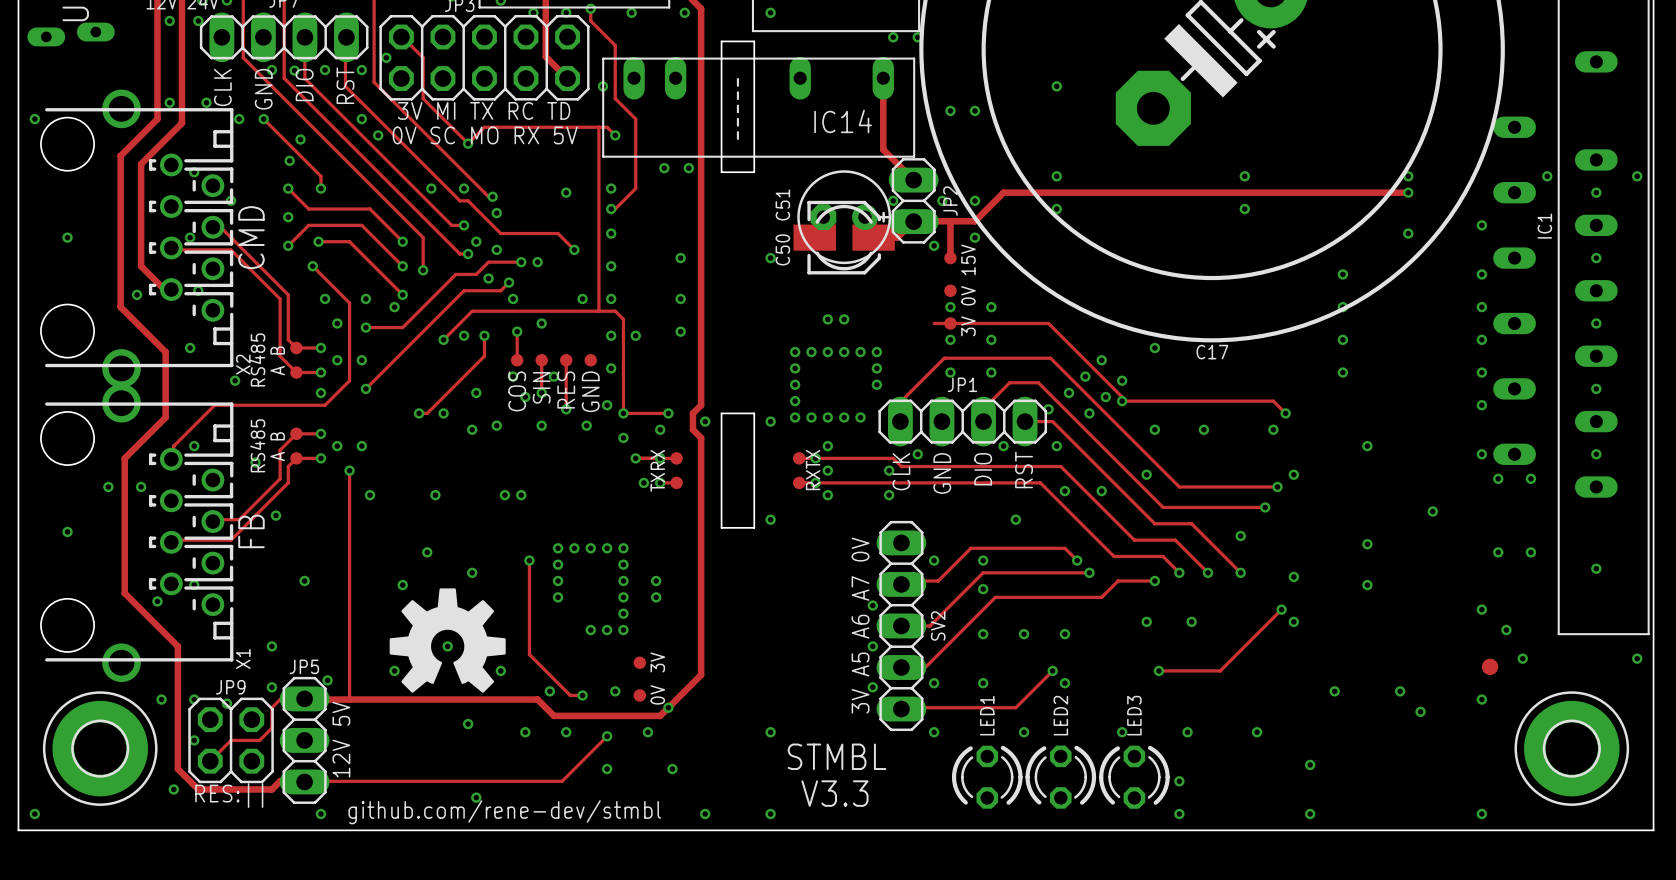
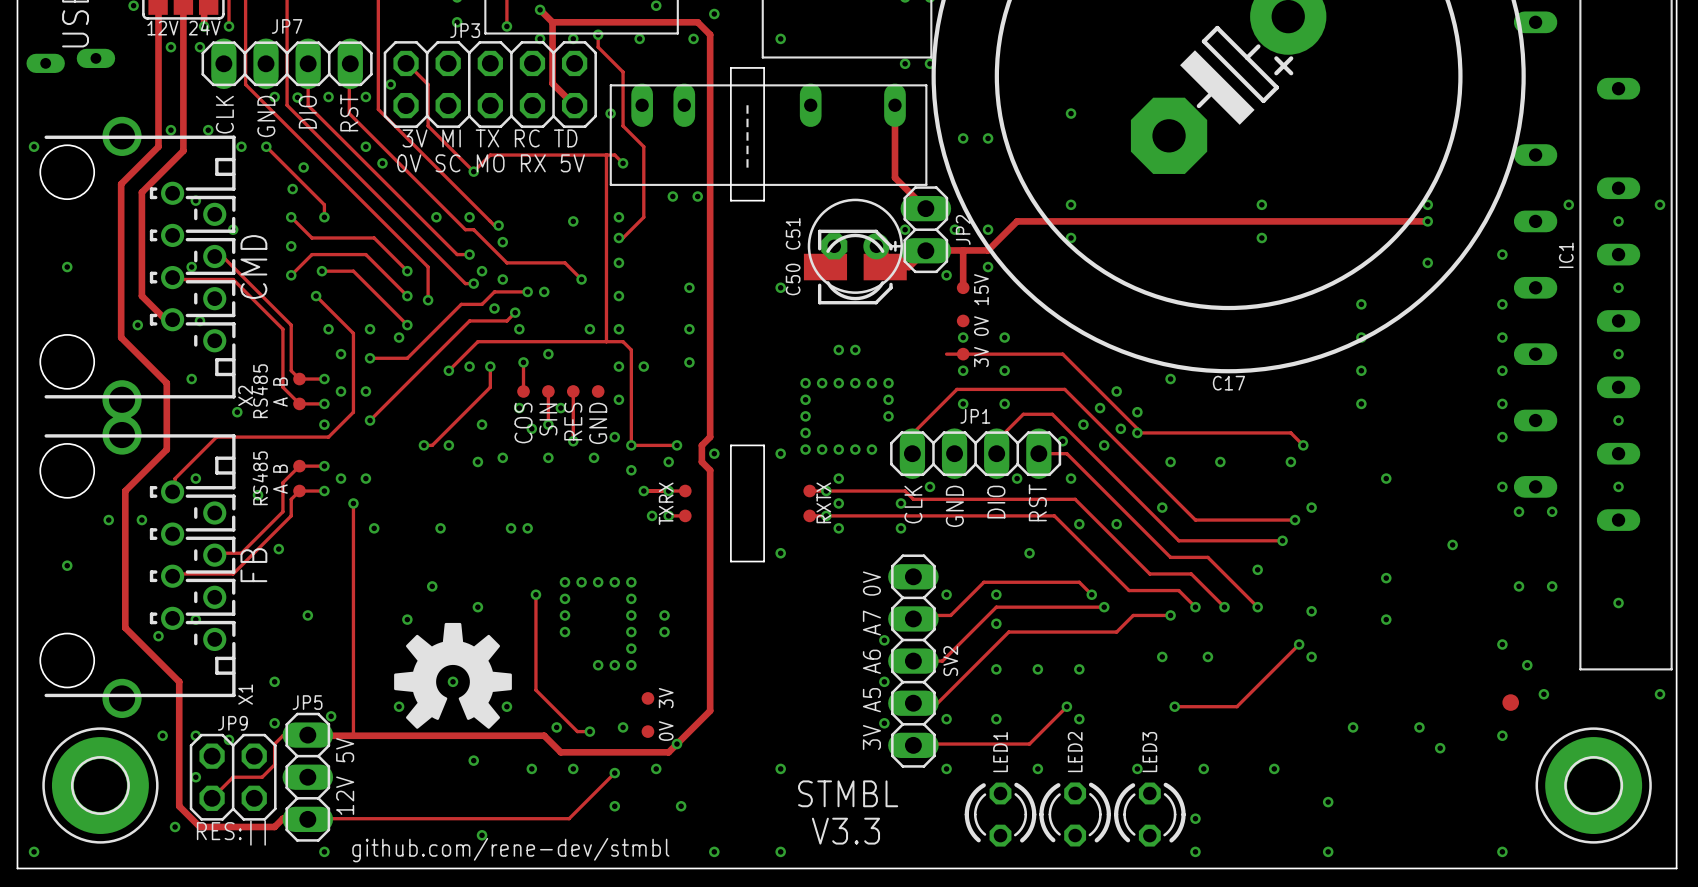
IC14 name: IC14 (843, 121) -> none

